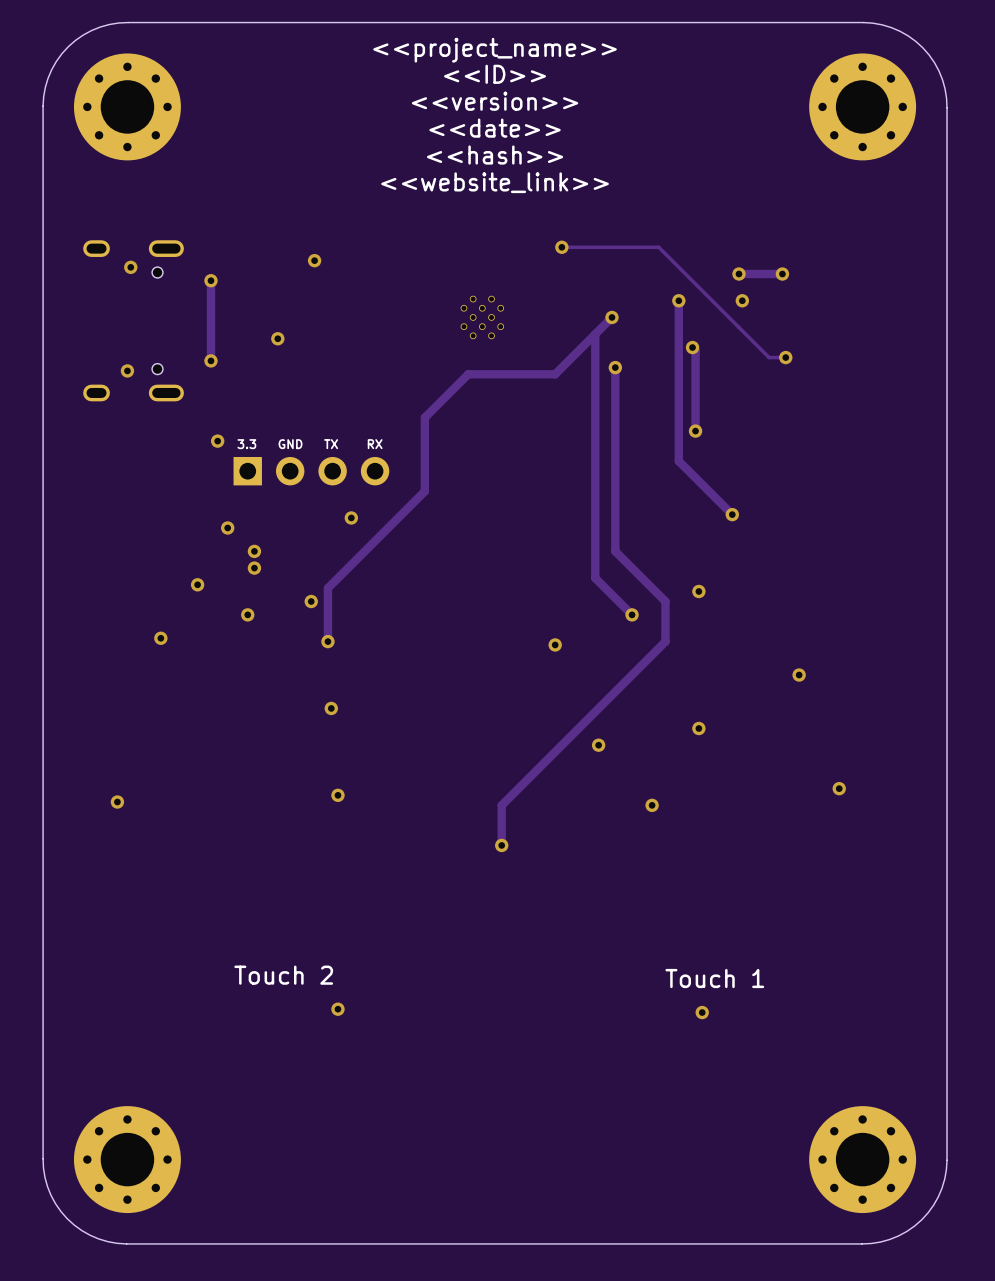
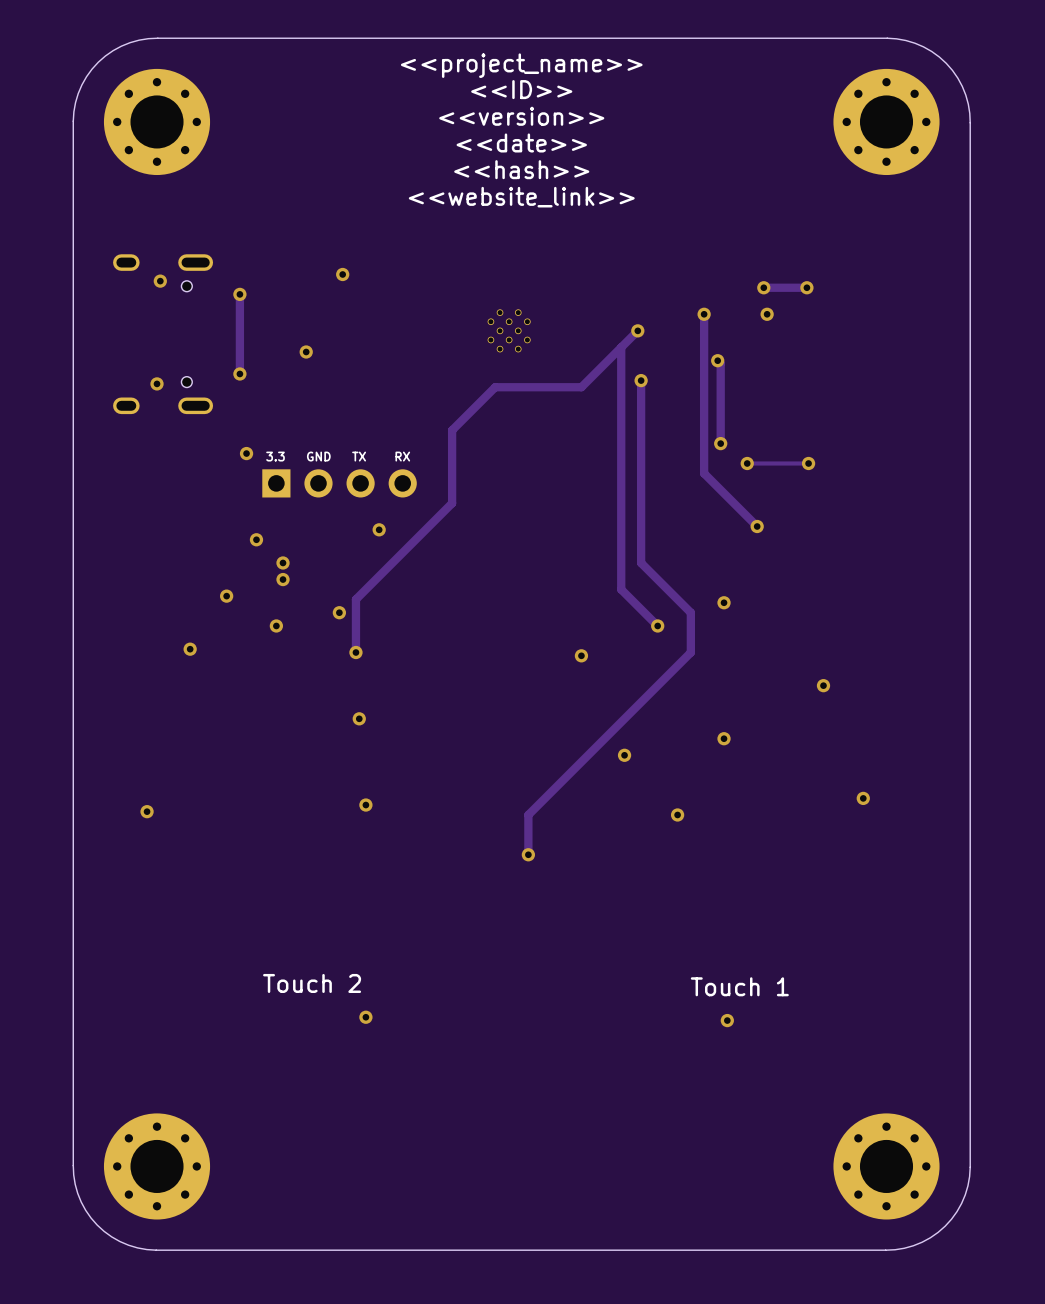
track: (561, 247) (658, 247) (769, 357) (785, 357) -> none
via: (561, 247) -> none
via: (785, 357) -> none
via: none -> (747, 463)
track: none -> (808, 463) (747, 463)
via: none -> (808, 463)

